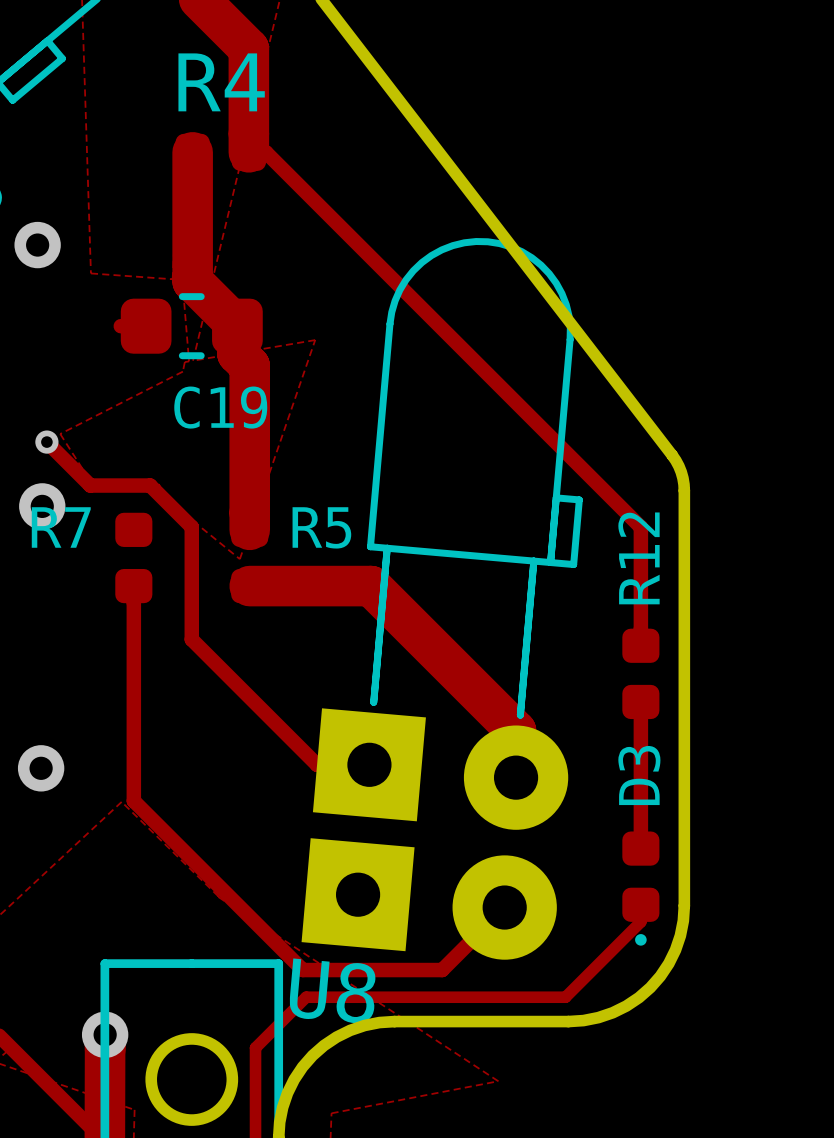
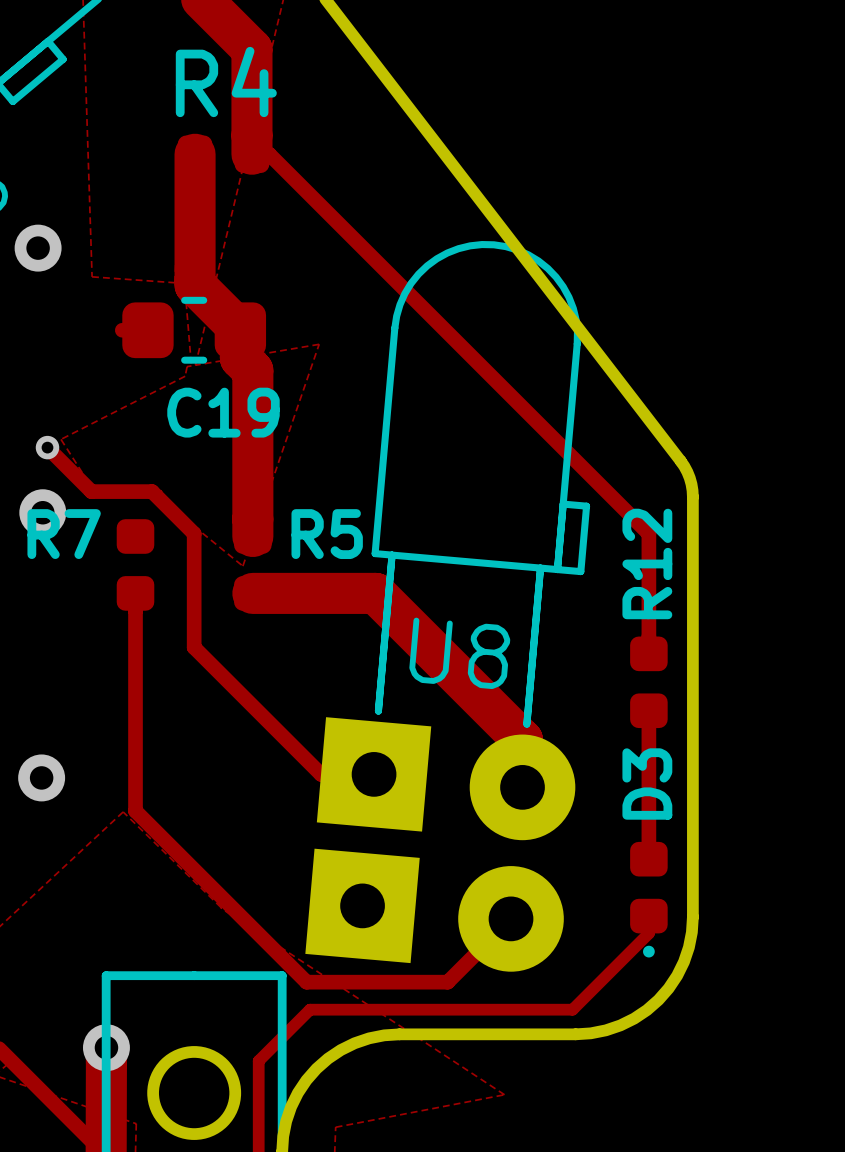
U8 name position: U8 (332, 991) -> U8 (459, 653)

